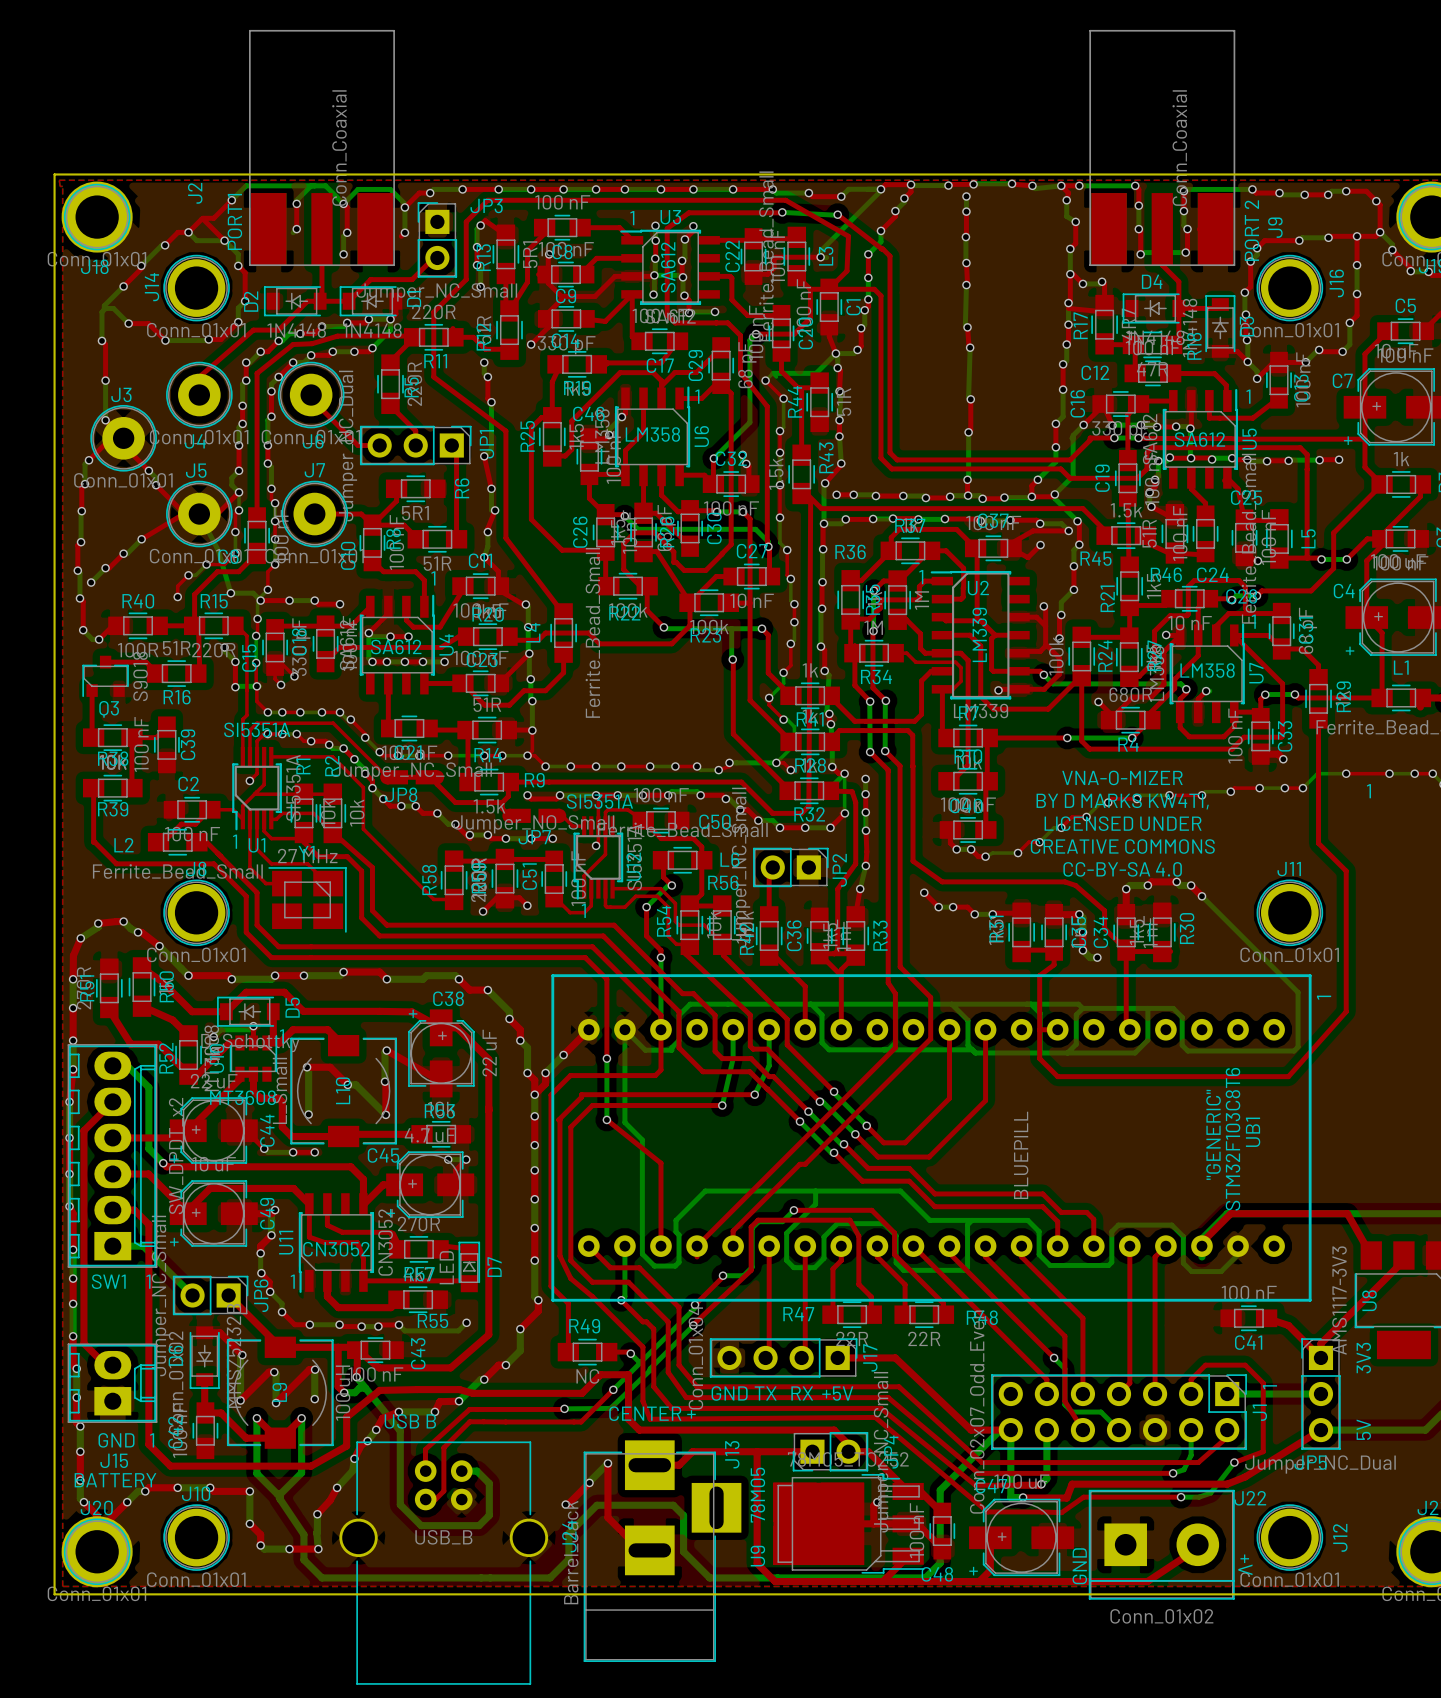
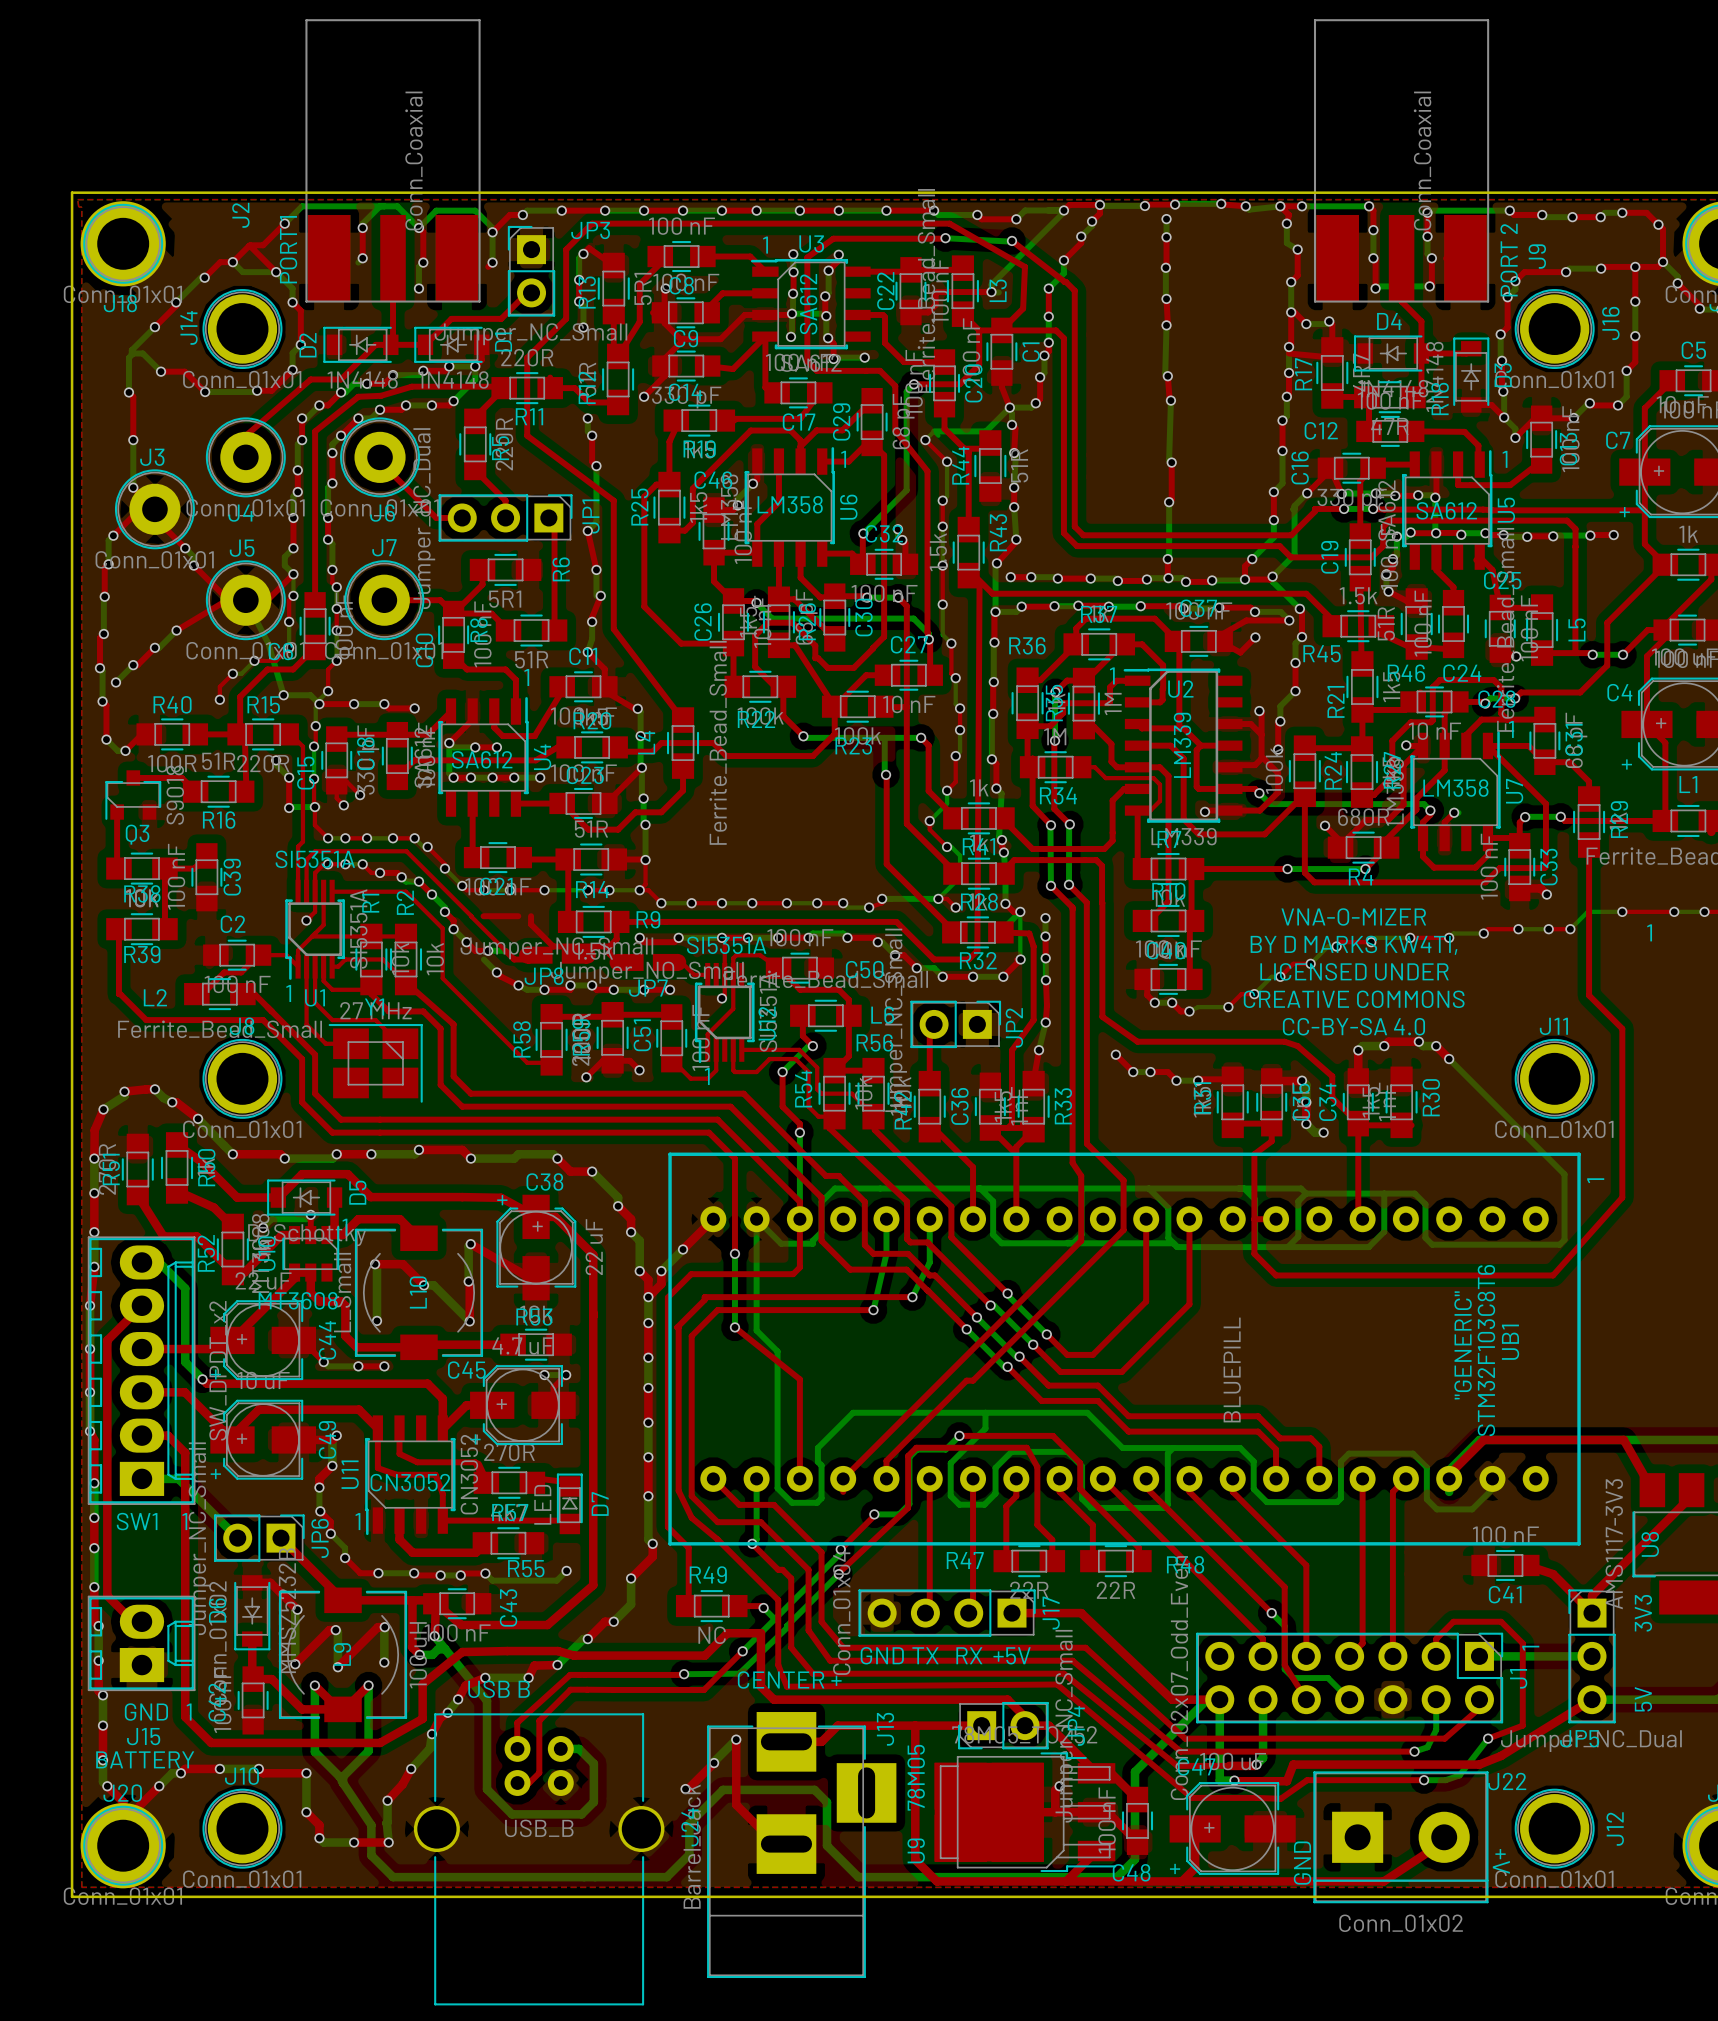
top track: none -> (471, 915) (505, 950)
JP8 position: (412, 777) -> (557, 955)
via: (415, 806) -> none
bottom track: none -> (483, 959) (496, 972)
bottom track: (437, 813) (448, 824) (455, 824) -> none
via: (437, 813) -> none
top track: none -> (496, 972) (518, 985)
via: none -> (496, 972)
top track: (455, 824) (469, 838) -> (544, 989) (570, 989)
via: (455, 824) -> none
bottom track: none -> (518, 985) (527, 989) (544, 989)
via: none -> (518, 985)
via: none -> (544, 989)

